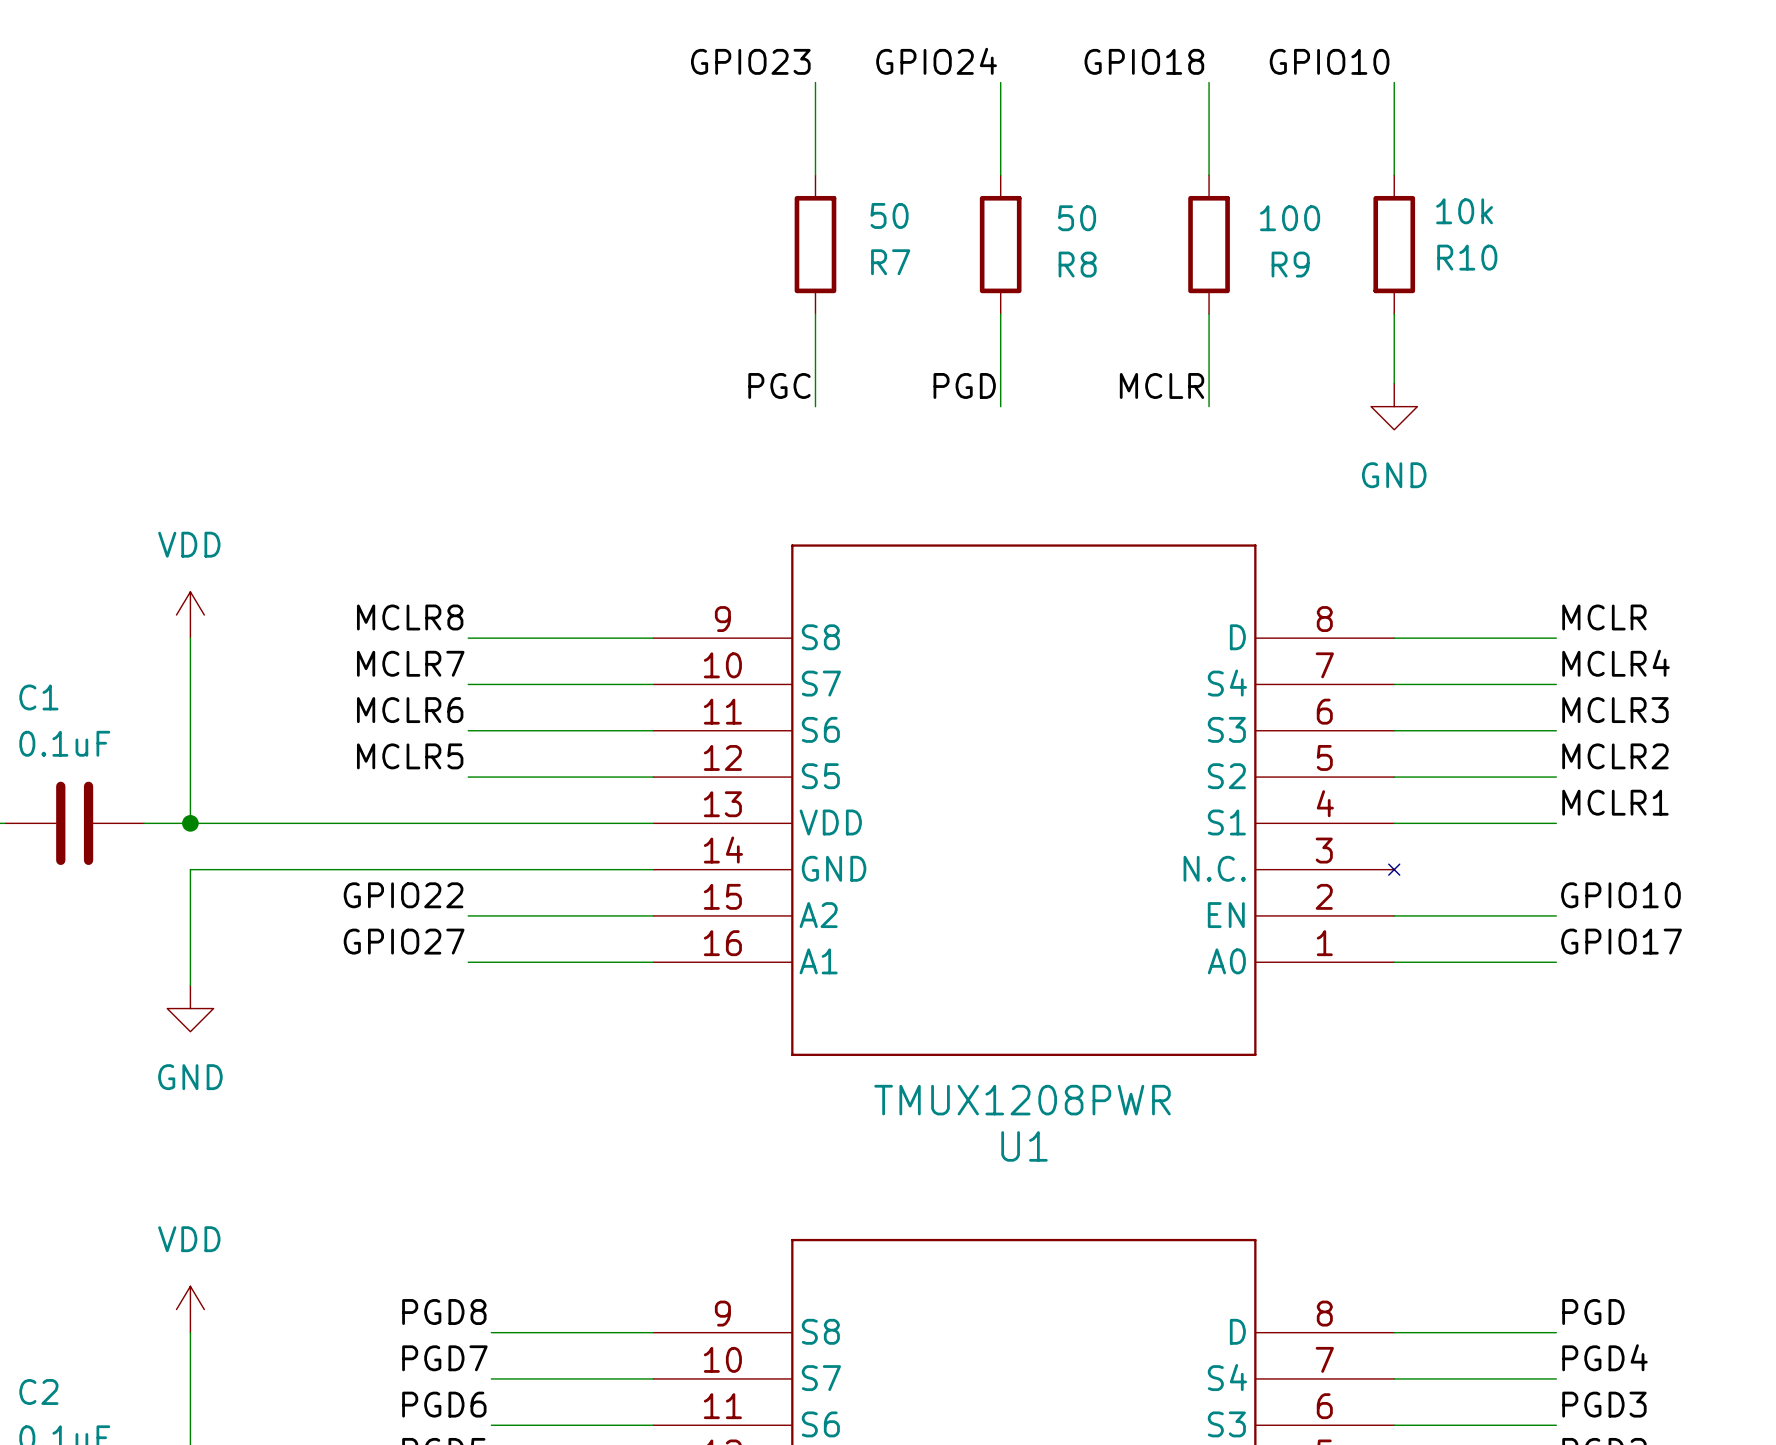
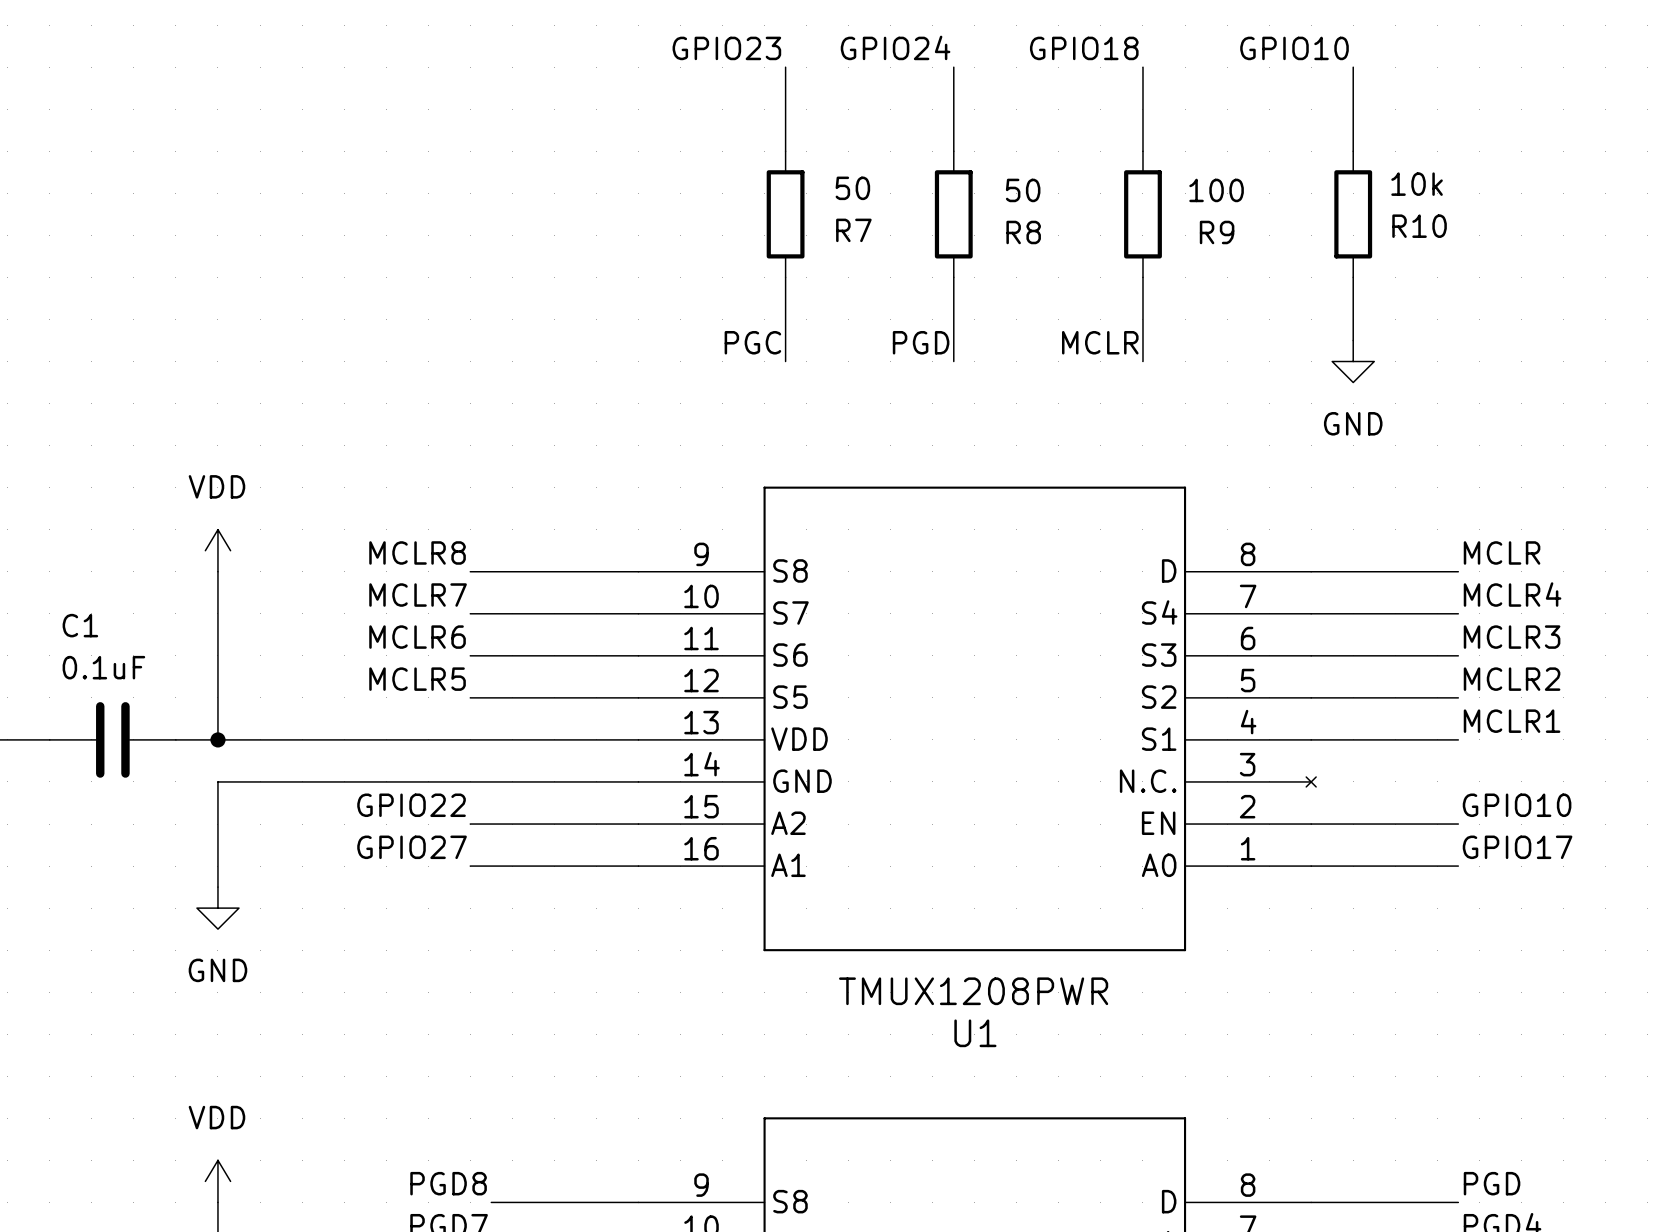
label position: GPIO10 (1329, 61) -> GPIO10 (1294, 48)
wire: (1394, 82) (1394, 175) -> (1353, 67) (1353, 151)
R10 position: (1394, 244) -> (1353, 214)
wire: (1394, 314) (1394, 383) -> (1353, 277) (1353, 340)
power symbol position: GND (1394, 406) -> GND (1353, 361)

